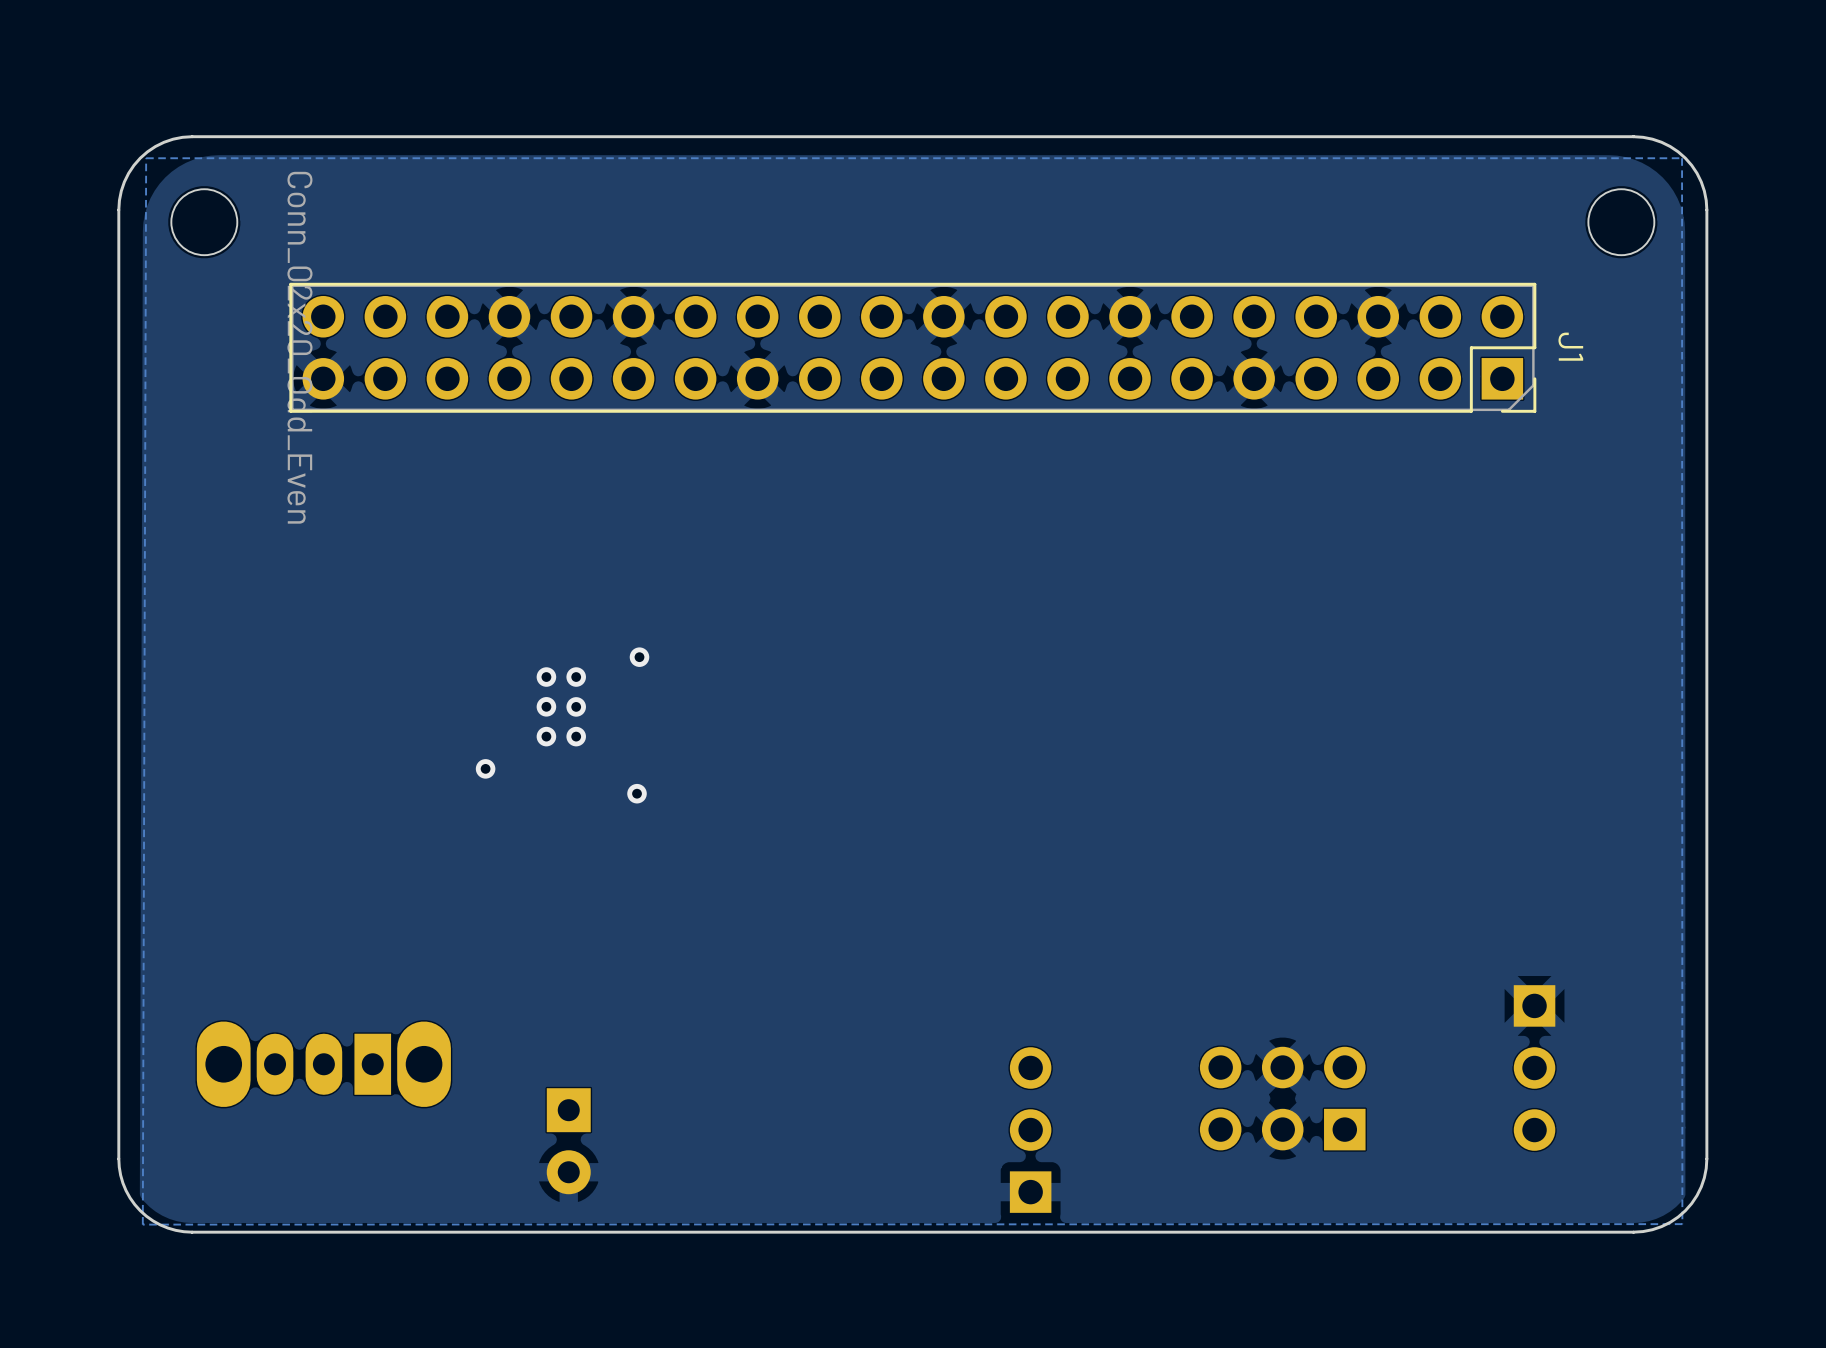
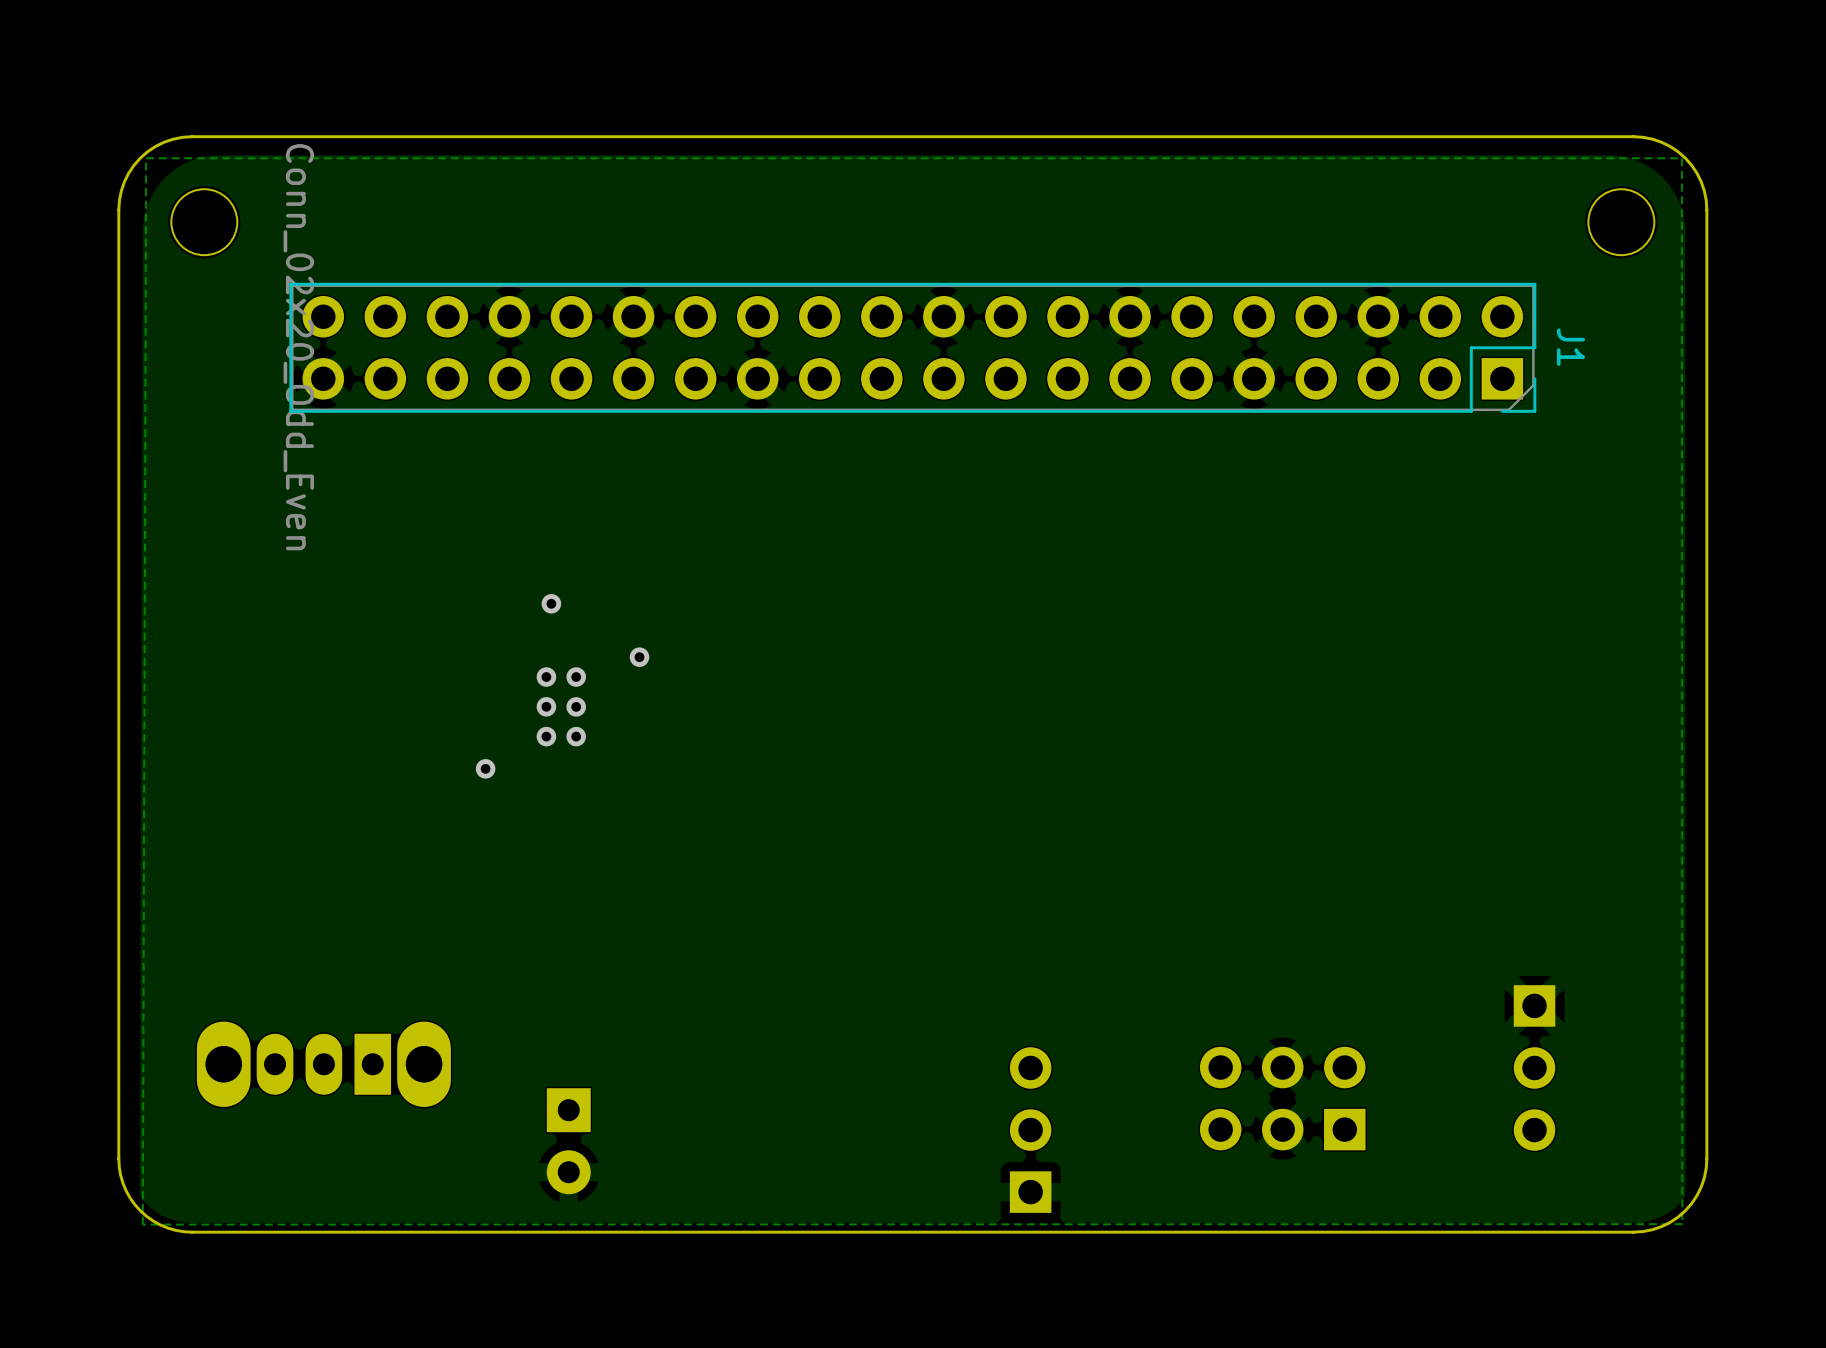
via: none -> (551, 603)
via: (637, 793) -> none

